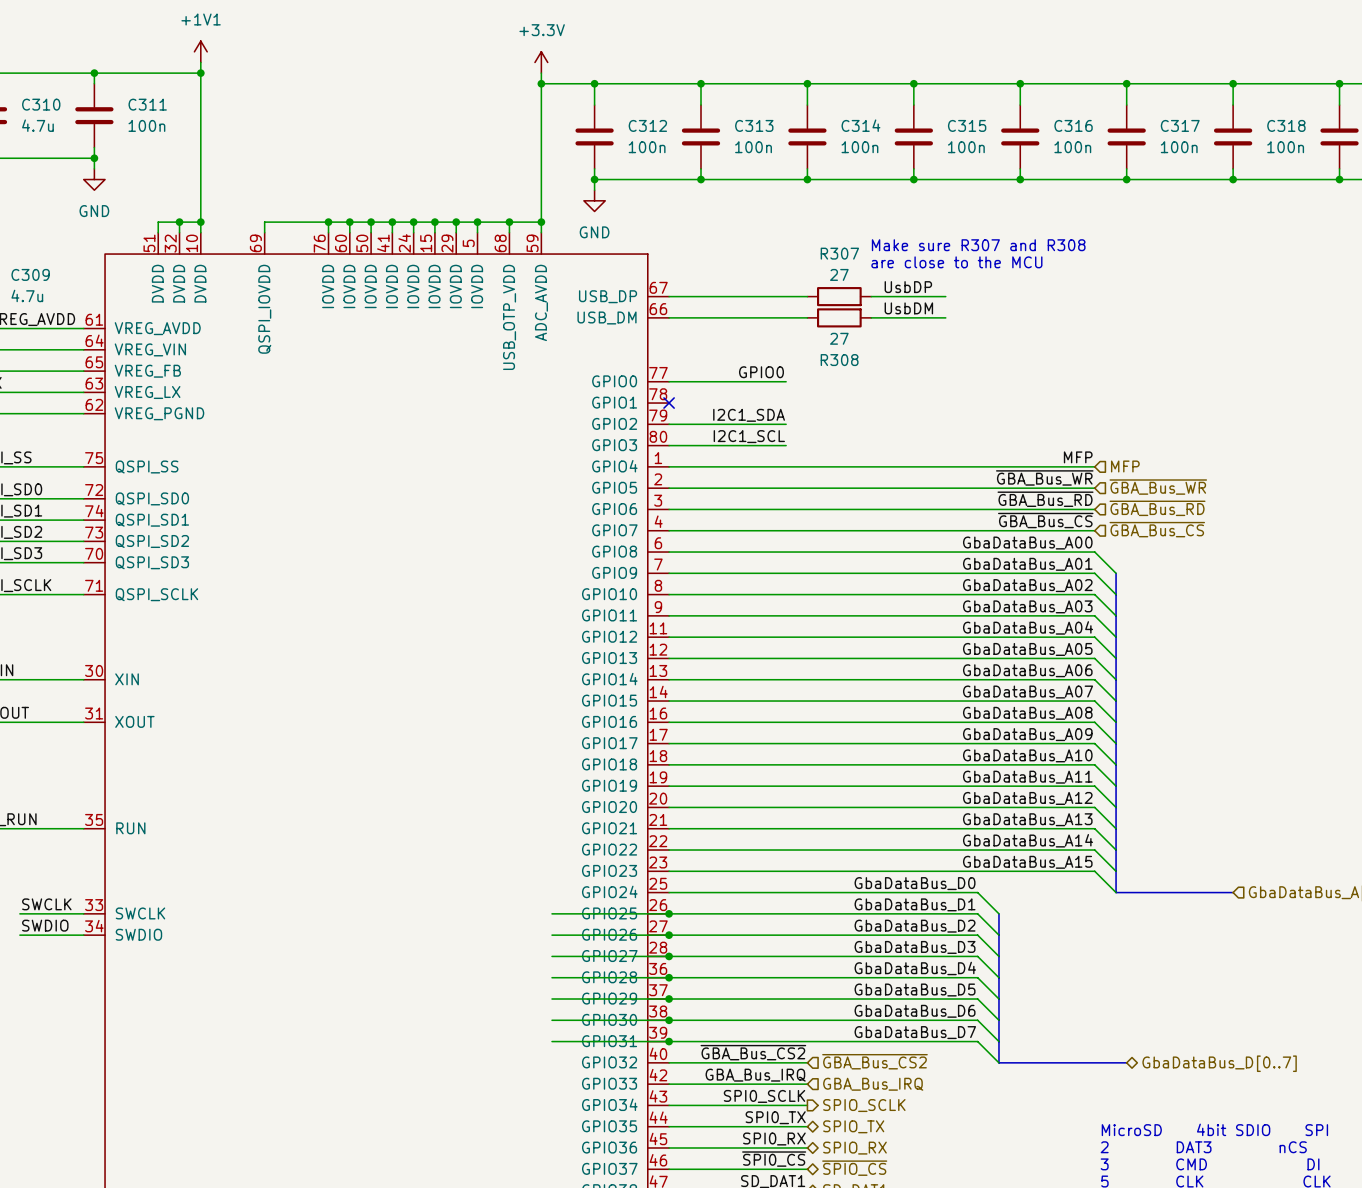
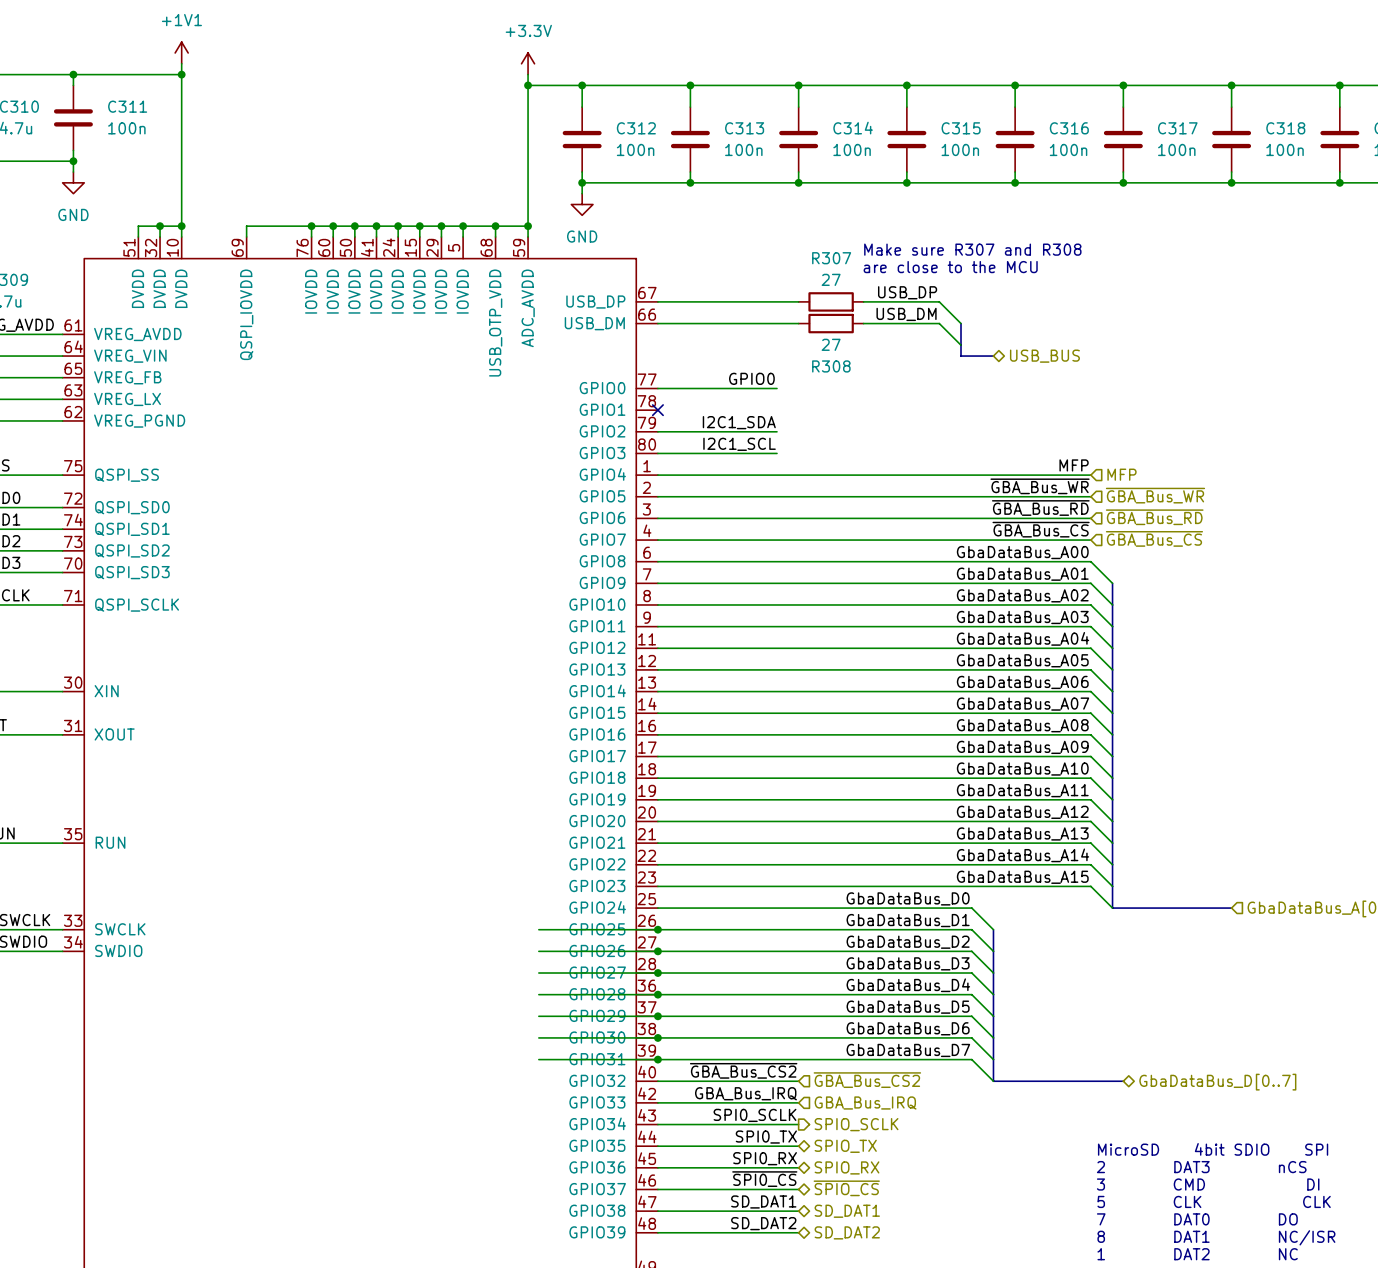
label: UsbDP (908, 287) -> none
label: none -> USB_DP (907, 292)
wire: none -> (939, 301) (961, 323)
label: UsbDM (908, 308) -> none
label: none -> USB_DM (906, 314)
wire: none -> (939, 323) (961, 345)
bus: none -> (961, 323) (961, 356) (993, 356)
hierarchical label: none -> USB_BUS (1044, 356)

